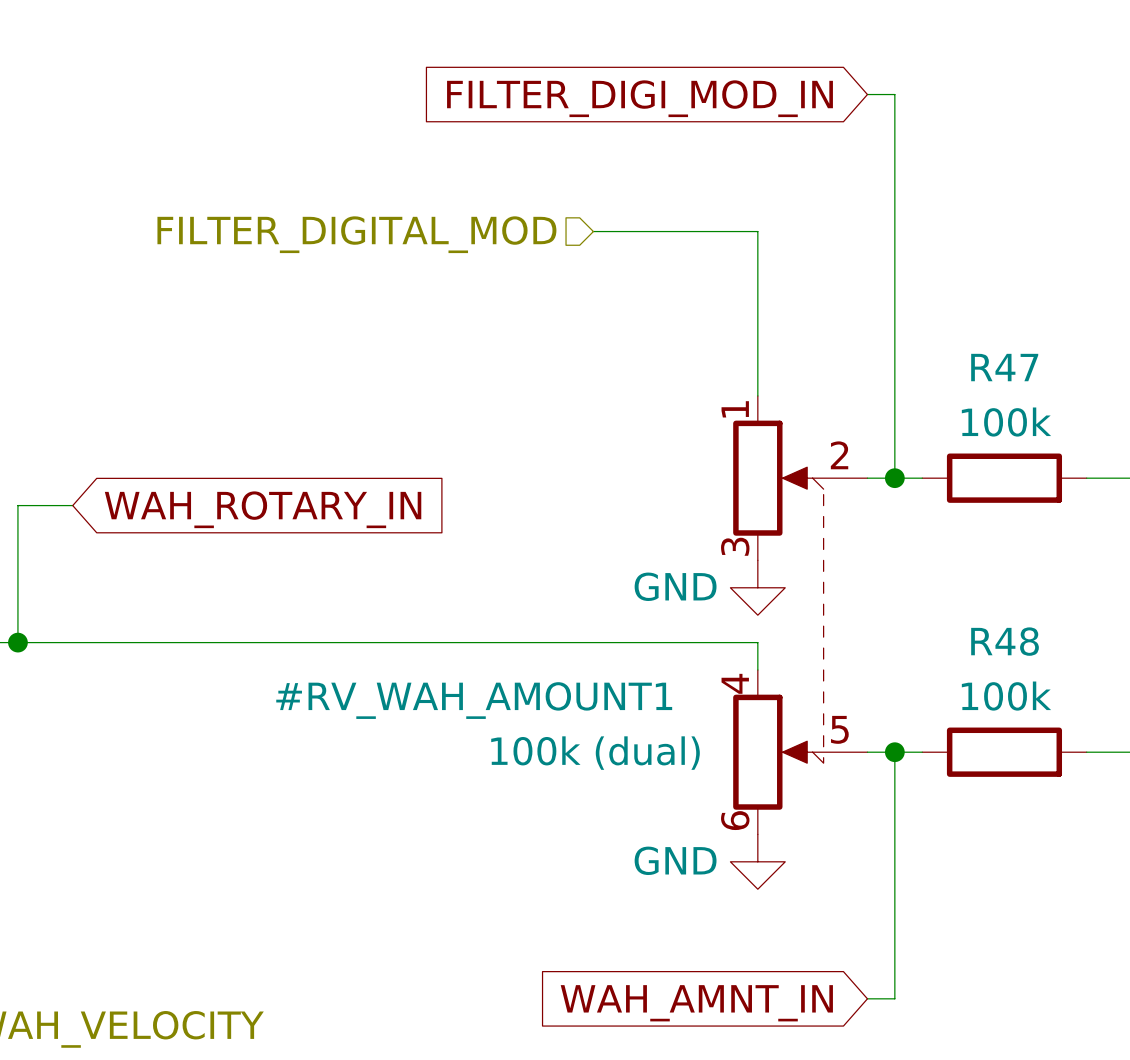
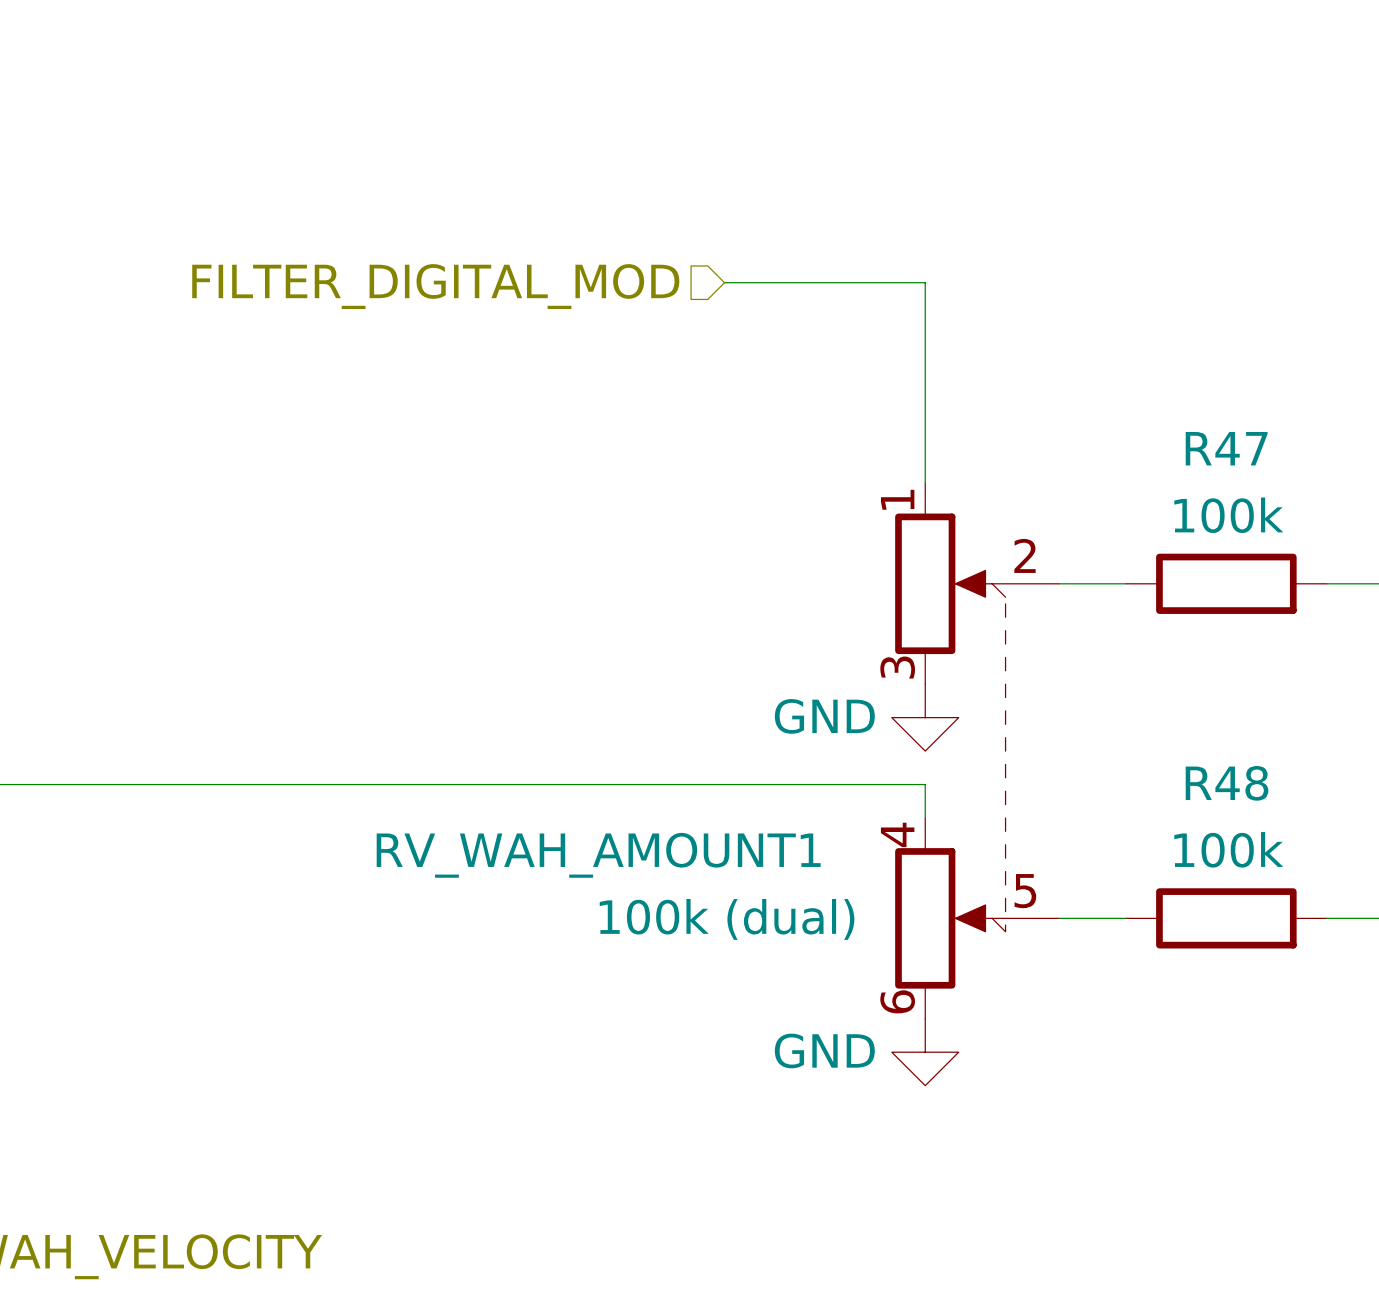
wire: (867, 94) (894, 94) (894, 478) -> none
global label: FILTER_DIGI_MOD_IN (640, 98) -> none
junction: (894, 478) -> none
wire: (72, 505) (17, 505) (17, 642) -> none
global label: WAH_ROTARY_IN (263, 509) -> none
#RV_WAH_AMOUNT1: 100k (dual) (800, 615) -> none
junction: (17, 642) -> none
wire: (894, 752) (894, 998) (867, 998) -> none
junction: (894, 752) -> none
global label: WAH_AMNT_IN (696, 1003) -> none

